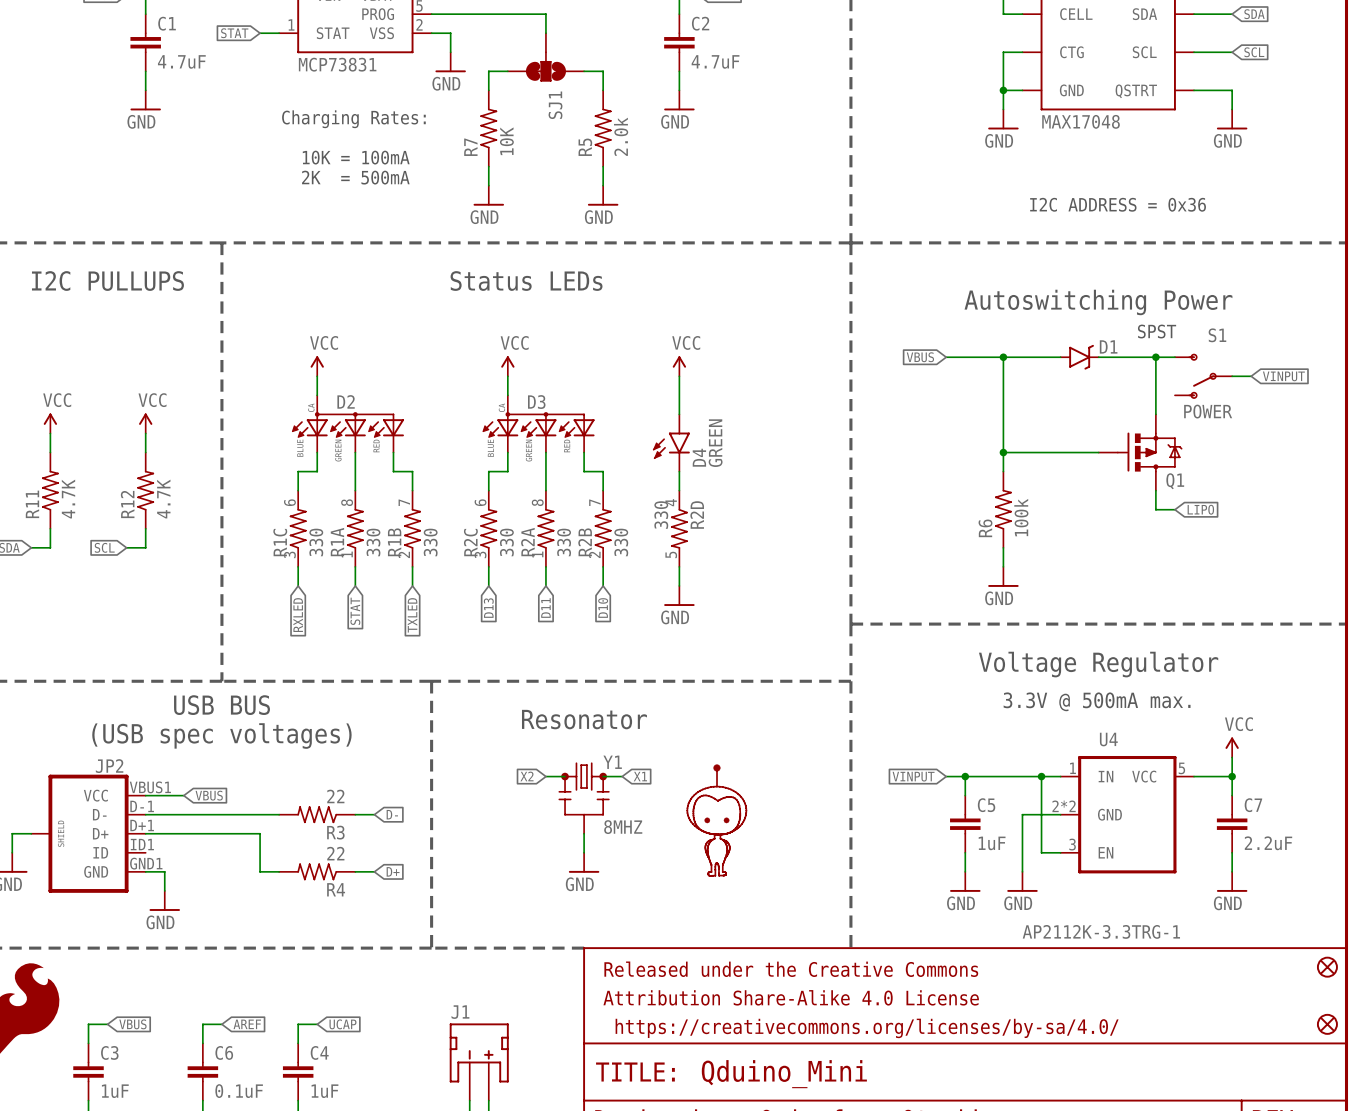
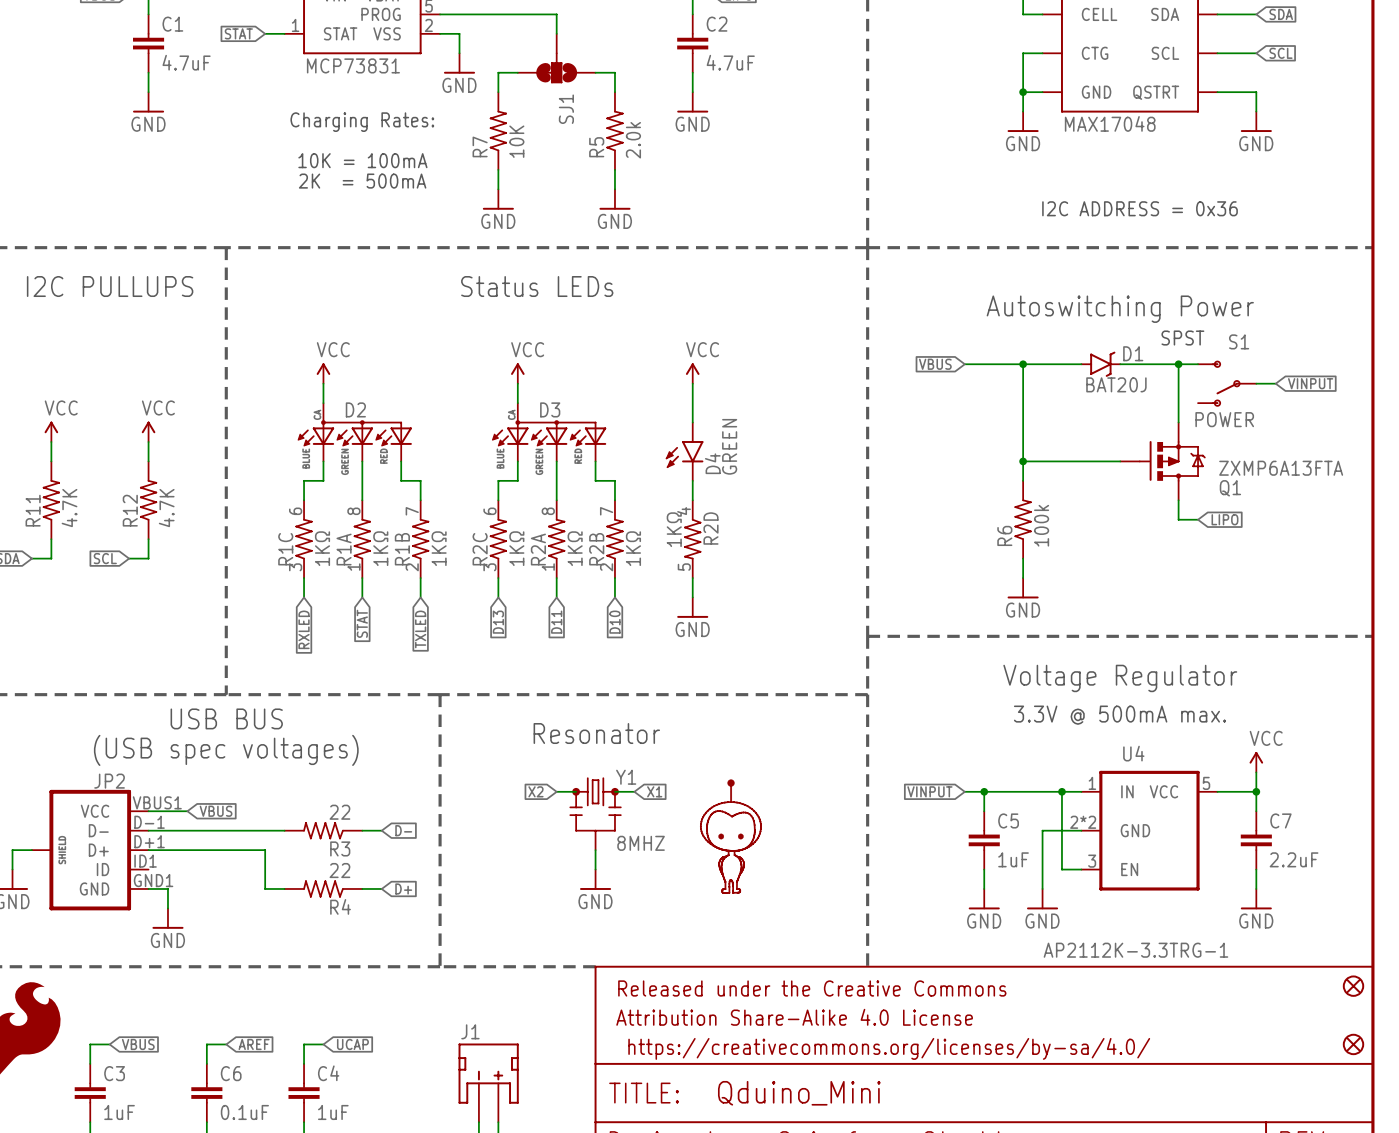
D1 value: none -> BAT20J (1116, 384)
Q1 value: none -> ZXMP6A13FTA (1281, 468)
Q1 name position: Q1 (1175, 481) -> Q1 (1230, 488)
R2D value: 330 (661, 515) -> 1KΩ (674, 529)
R1C value: 330 (316, 542) -> 1KΩ (322, 548)
R1A value: 330 (373, 542) -> 1KΩ (380, 548)
R1B value: 330 (430, 542) -> 1KΩ (439, 548)
R2C value: 330 (506, 542) -> 1KΩ (516, 548)
R2A value: 330 (564, 542) -> 1KΩ (575, 548)
R2B value: 330 (621, 542) -> 1KΩ (633, 548)

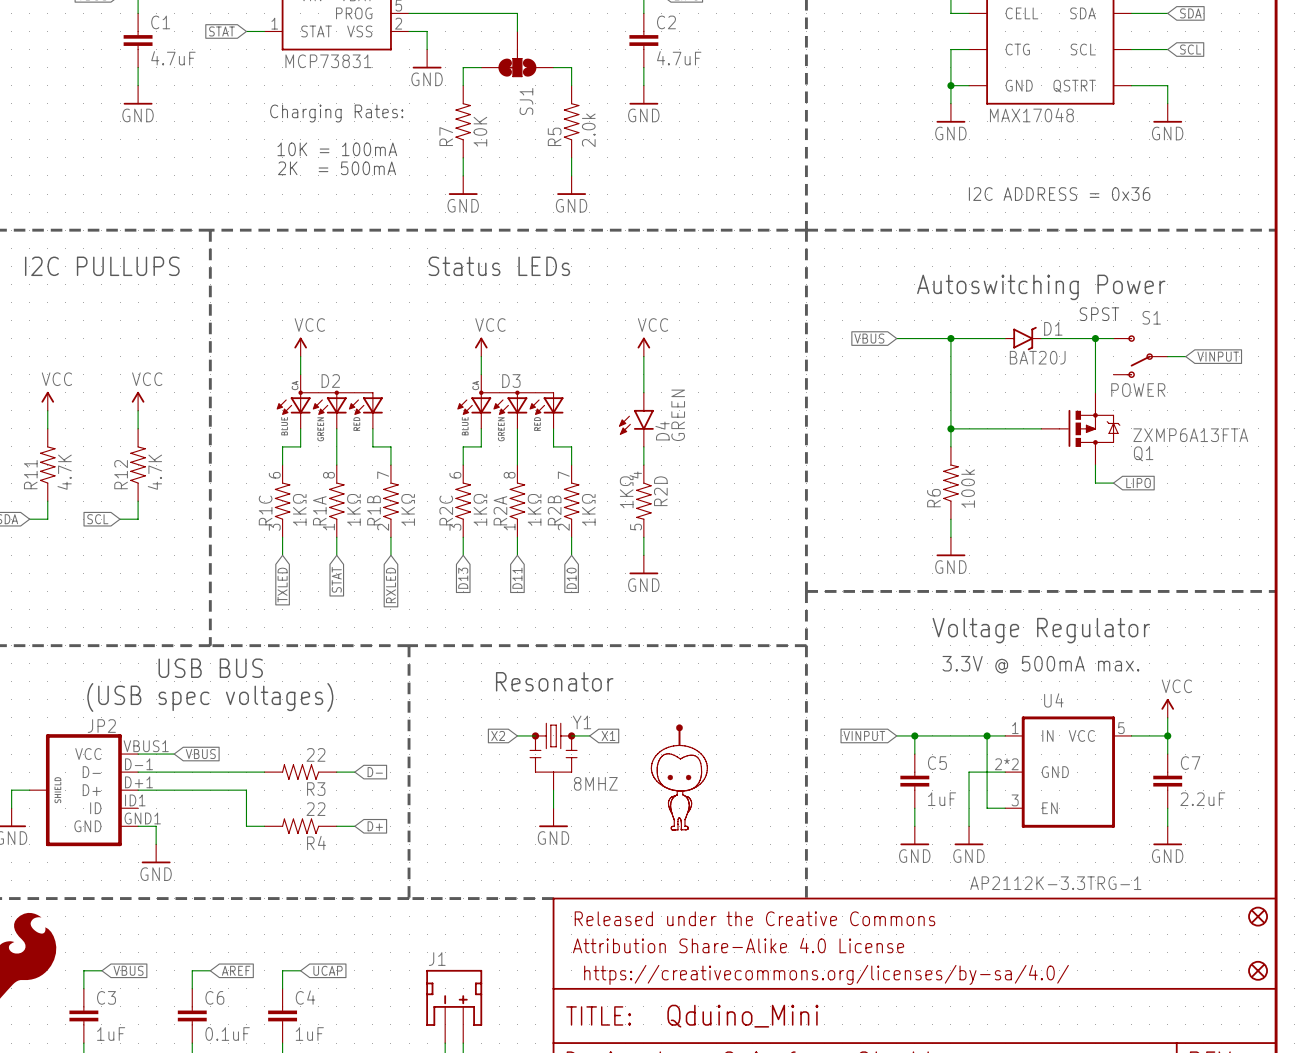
global label: RXLED (304, 629) -> TXLED (282, 585)
global label: TXLED (420, 629) -> RXLED (390, 585)

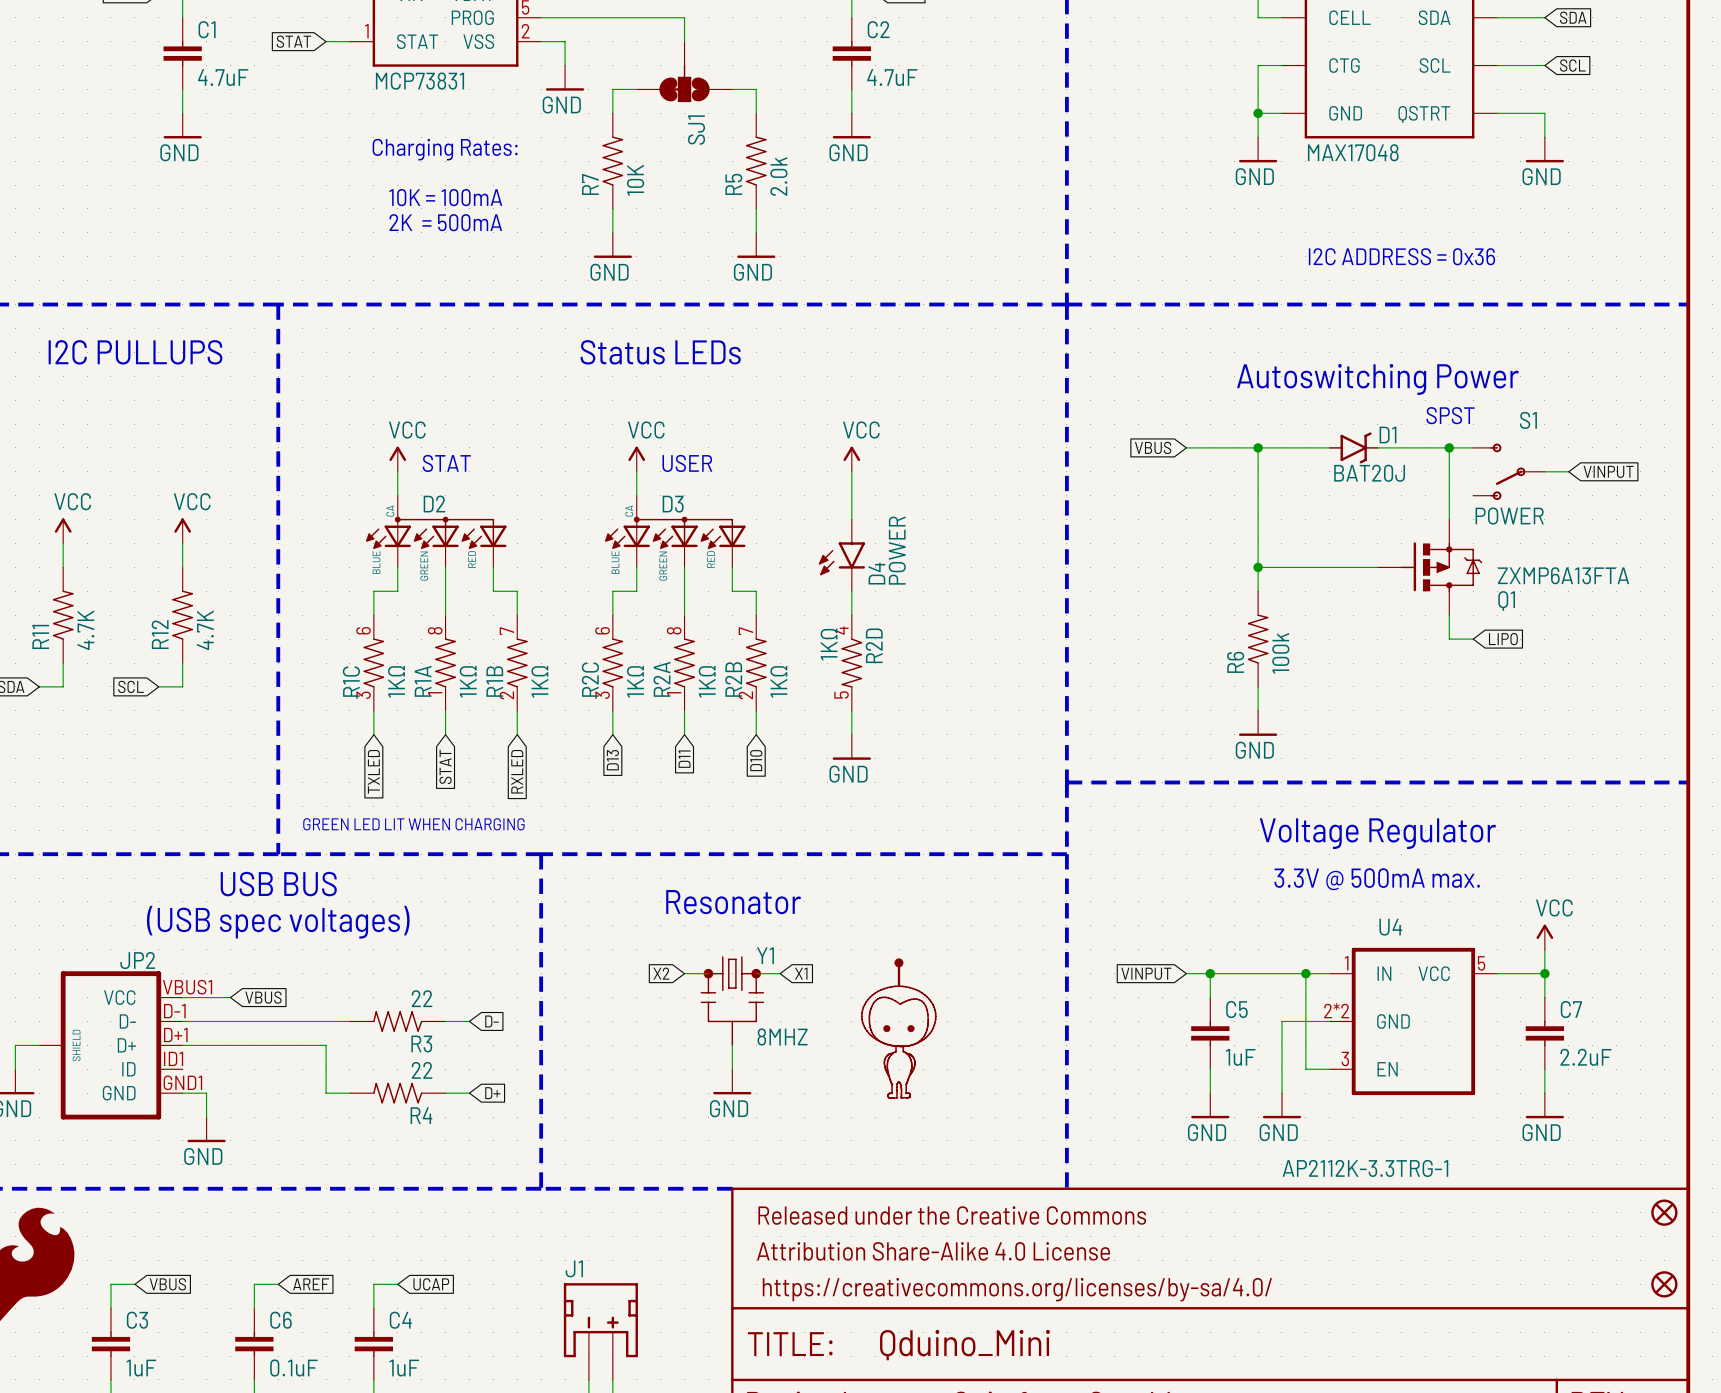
text: none -> STAT (446, 463)
text: none -> USER (687, 463)
D4 value: GREEN (678, 415) -> POWER (897, 550)
text: none -> GREEN LED LIT WHEN CHARGING (413, 824)

